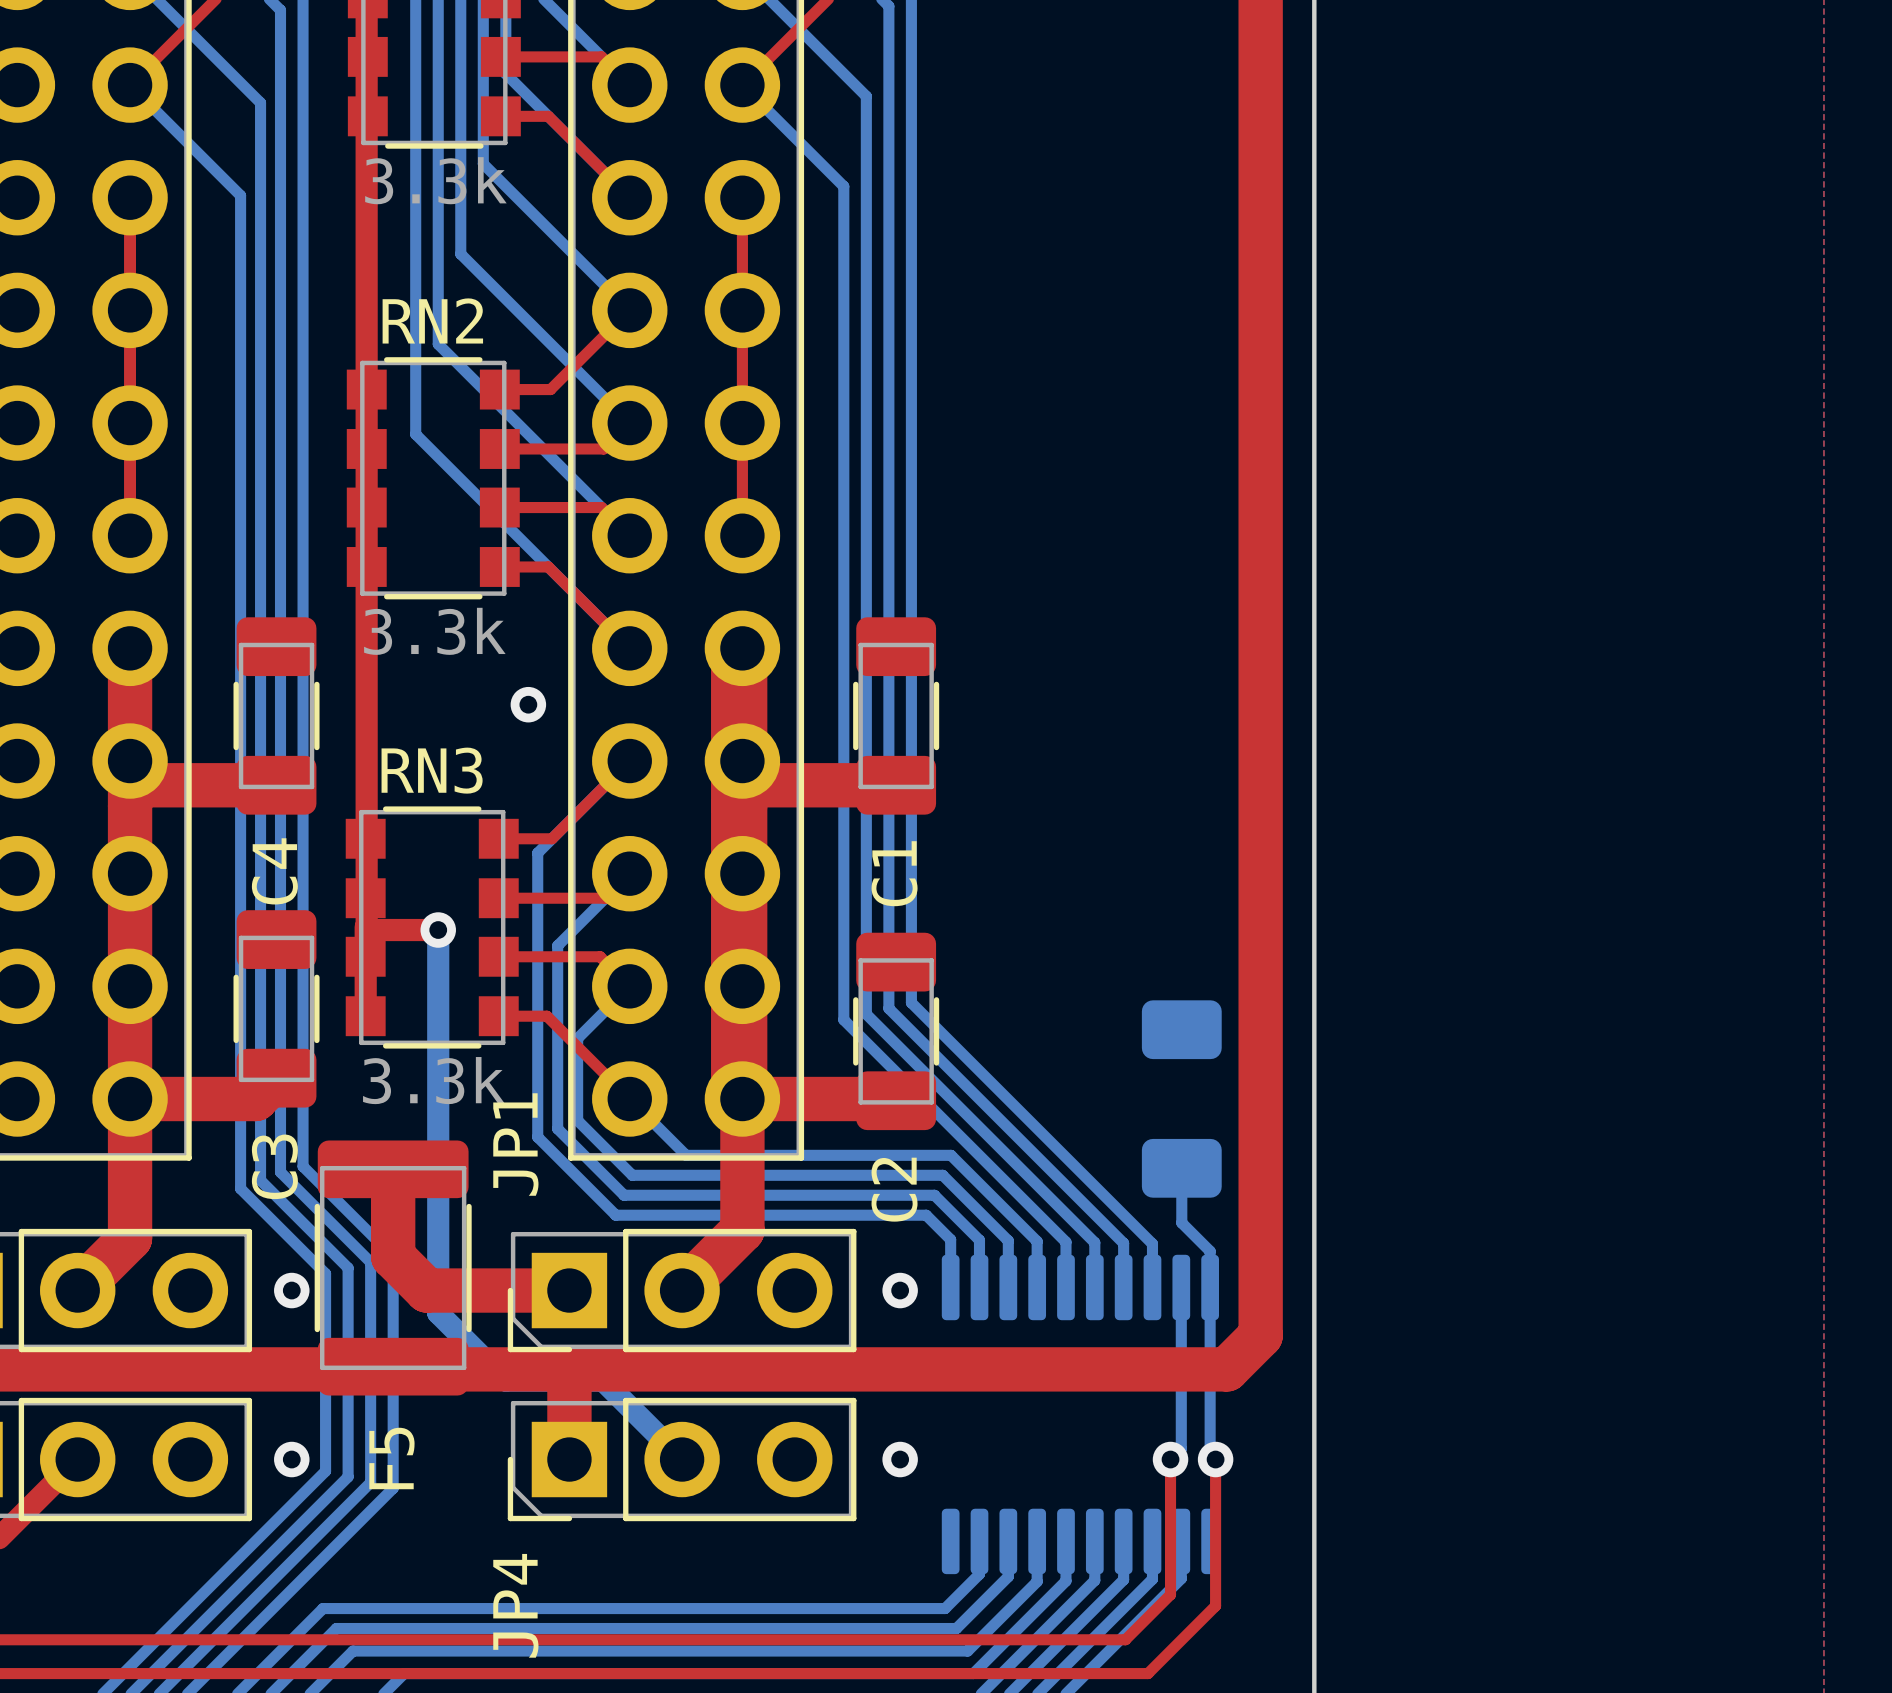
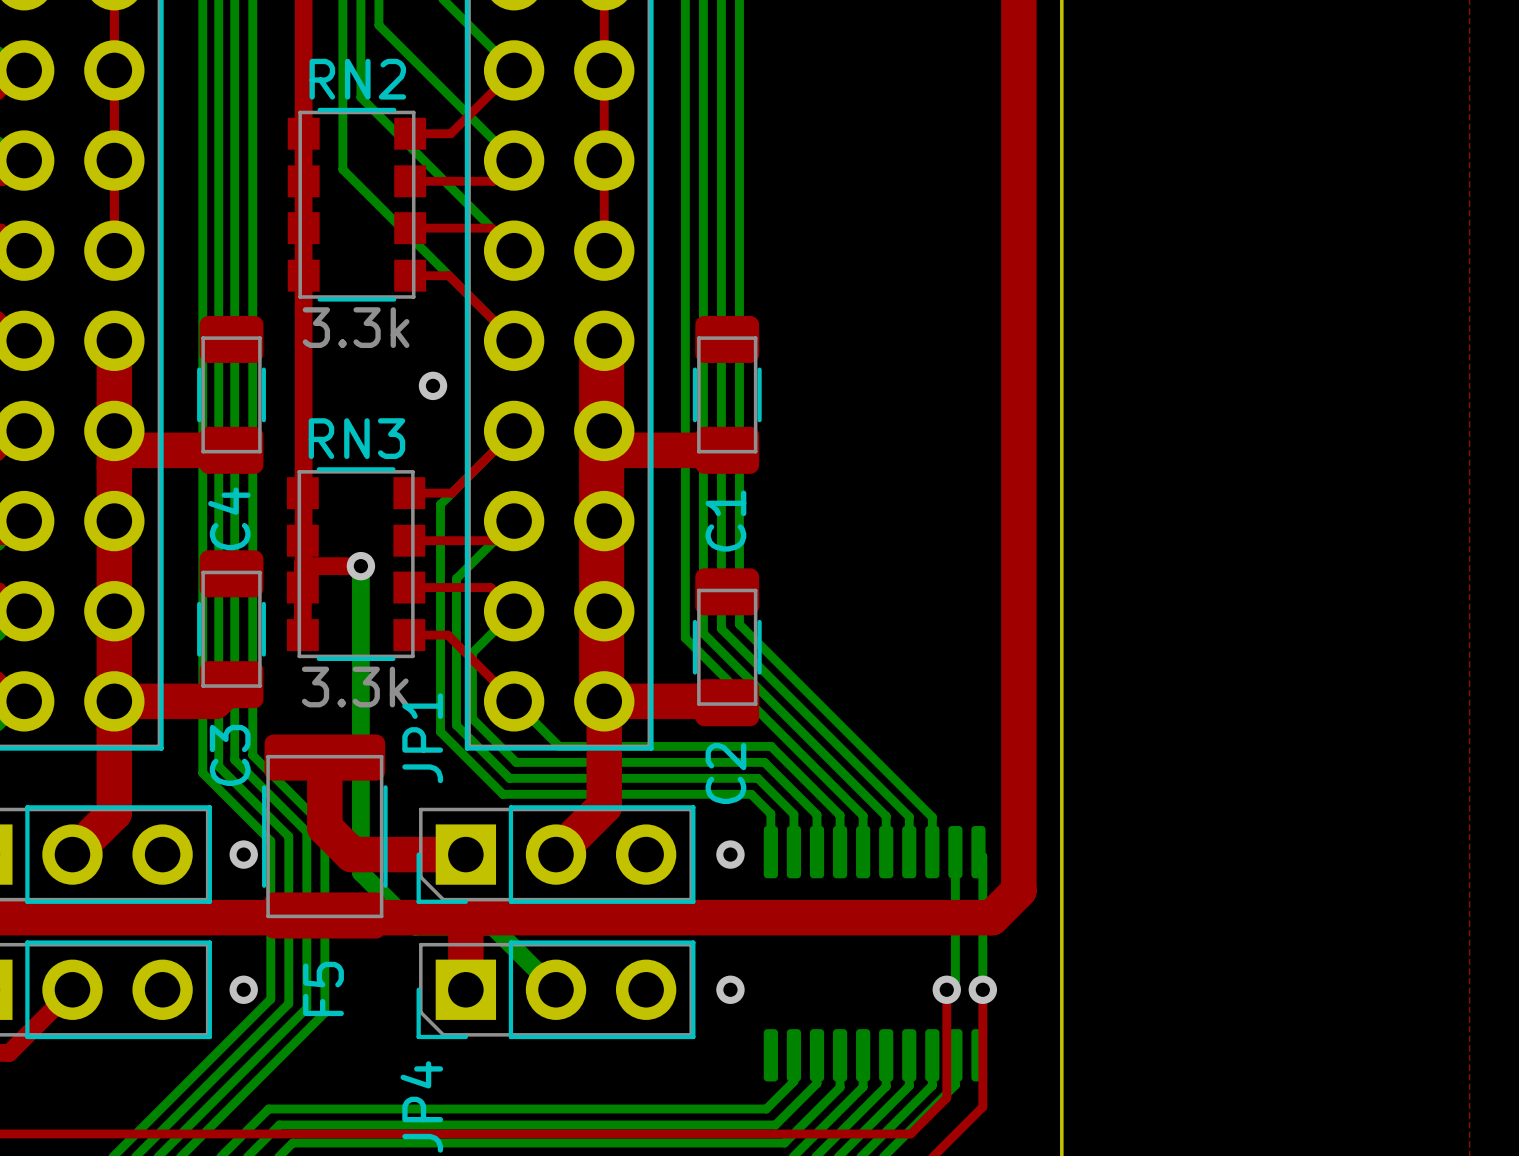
part: (1181, 1099) -> none
bottom track: (1181, 1168) (1181, 1222) (1210, 1251) (1210, 1454) (1215, 1459) -> (978, 852) (982, 856) (982, 989)

